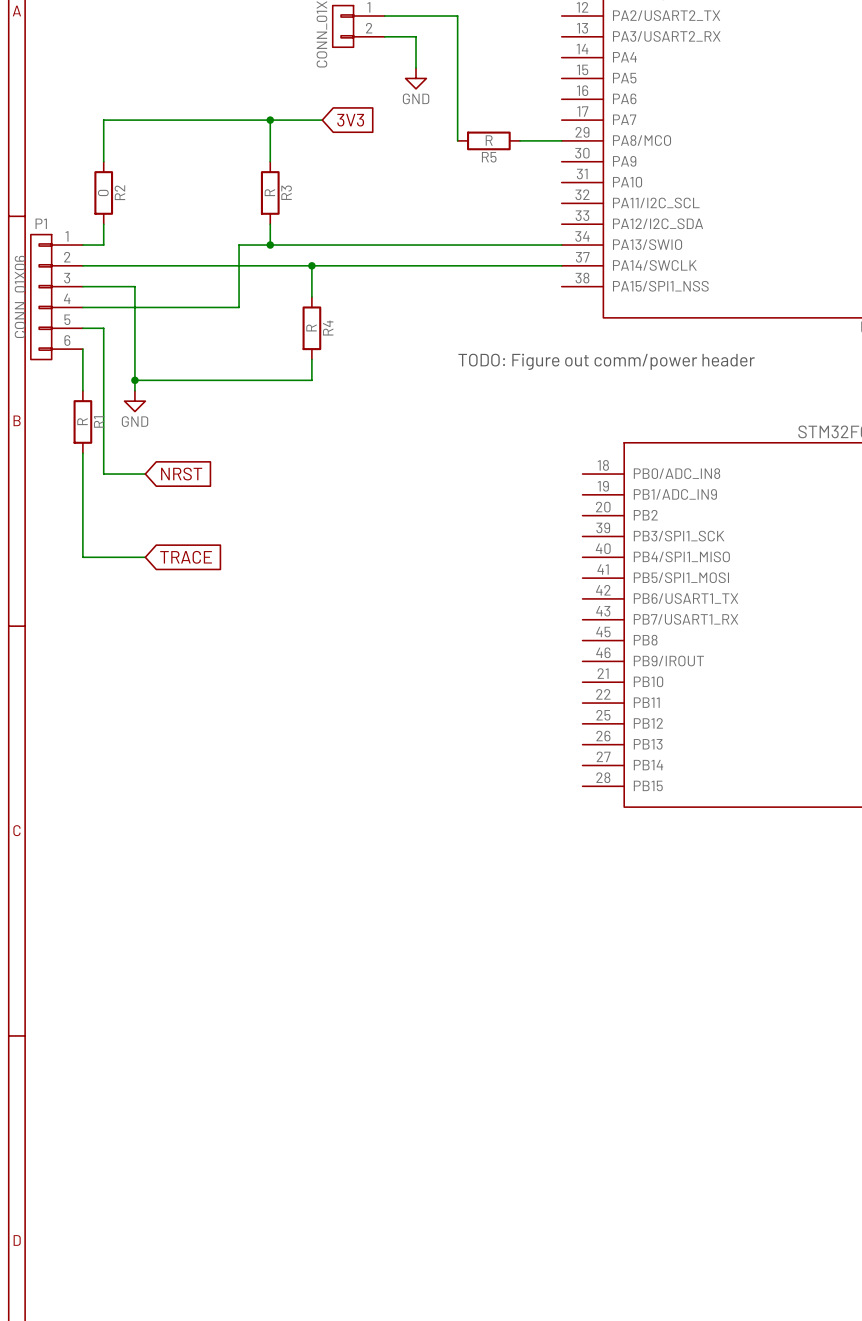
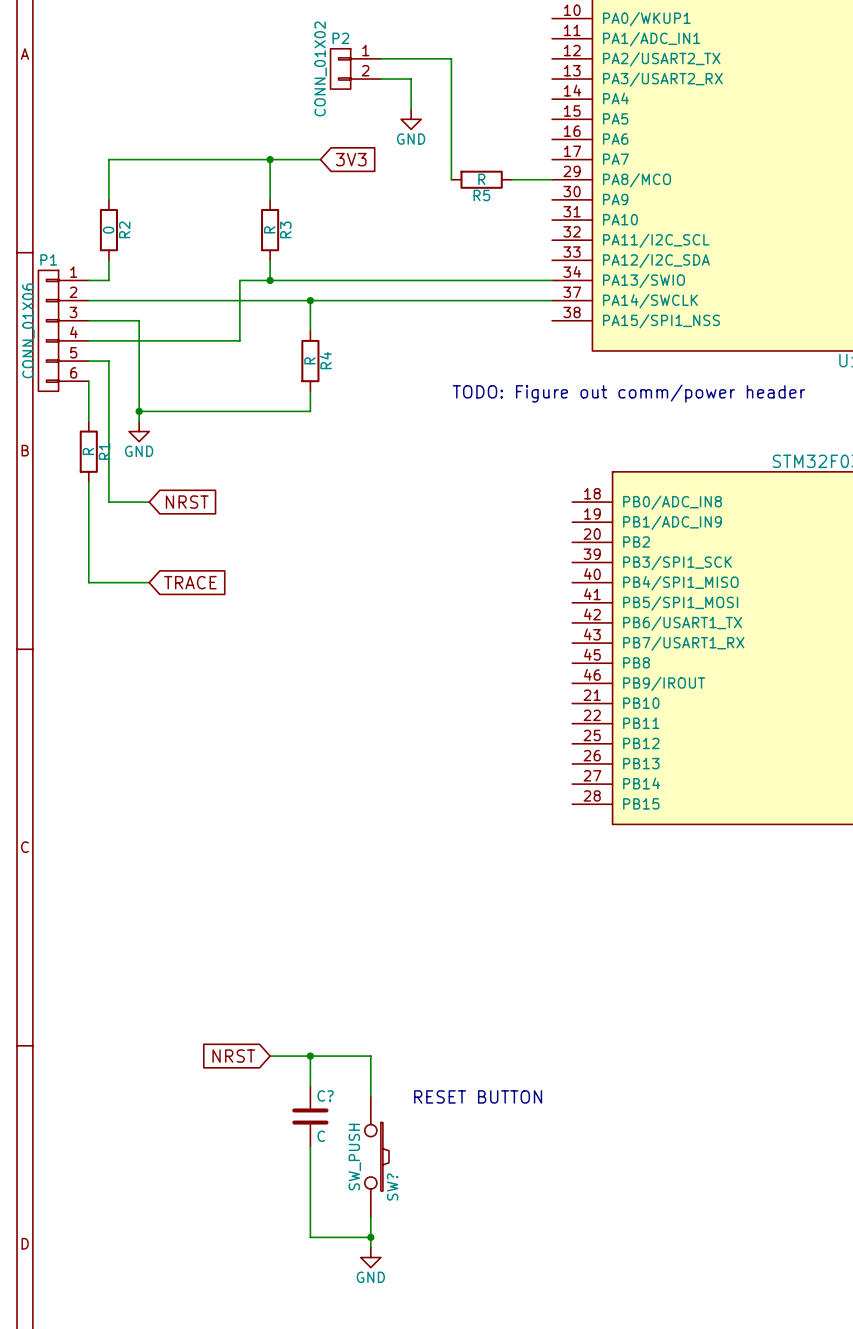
global label: none -> NRST (233, 1056)
wire: none -> (270, 1056) (370, 1056) (370, 1096)
wire: none -> (310, 1056) (310, 1086)
junction: none -> (310, 1056)
text: none -> RESET BUTTON (478, 1096)
C?: none -> C (310, 1116)
wire: none -> (310, 1146) (310, 1237) (370, 1237)
SW?: none -> SW_PUSH (376, 1156)
wire: none -> (370, 1217) (370, 1247)
junction: none -> (370, 1237)
power symbol: none -> GND (370, 1257)

